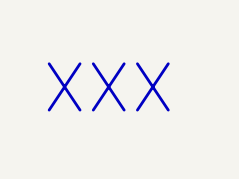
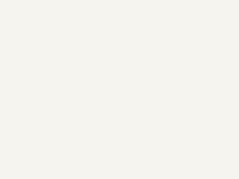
text: XXX (108, 86) -> none

